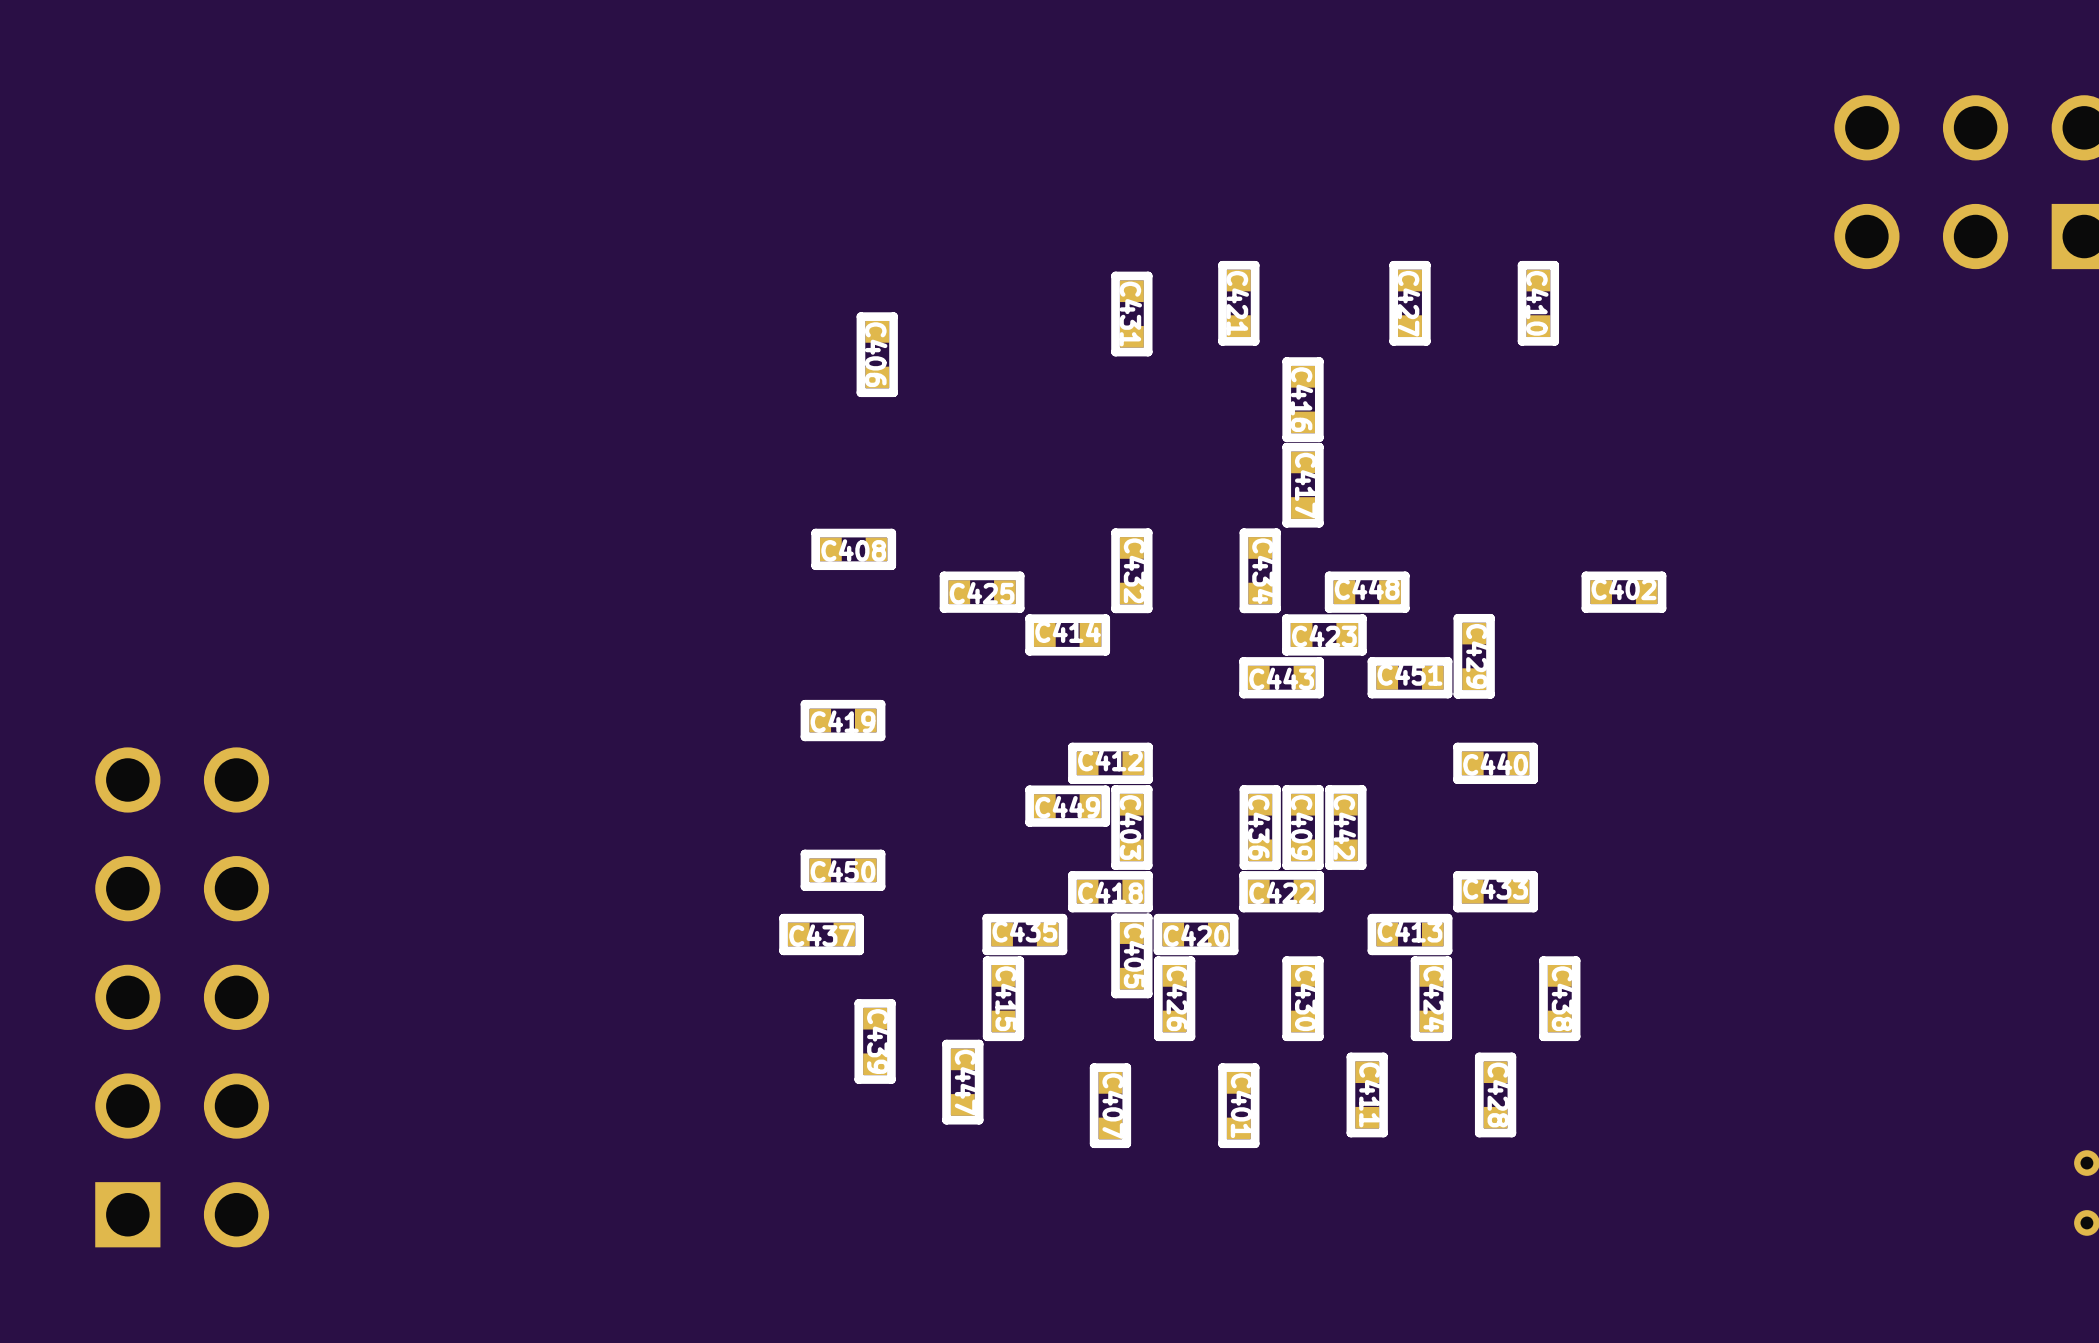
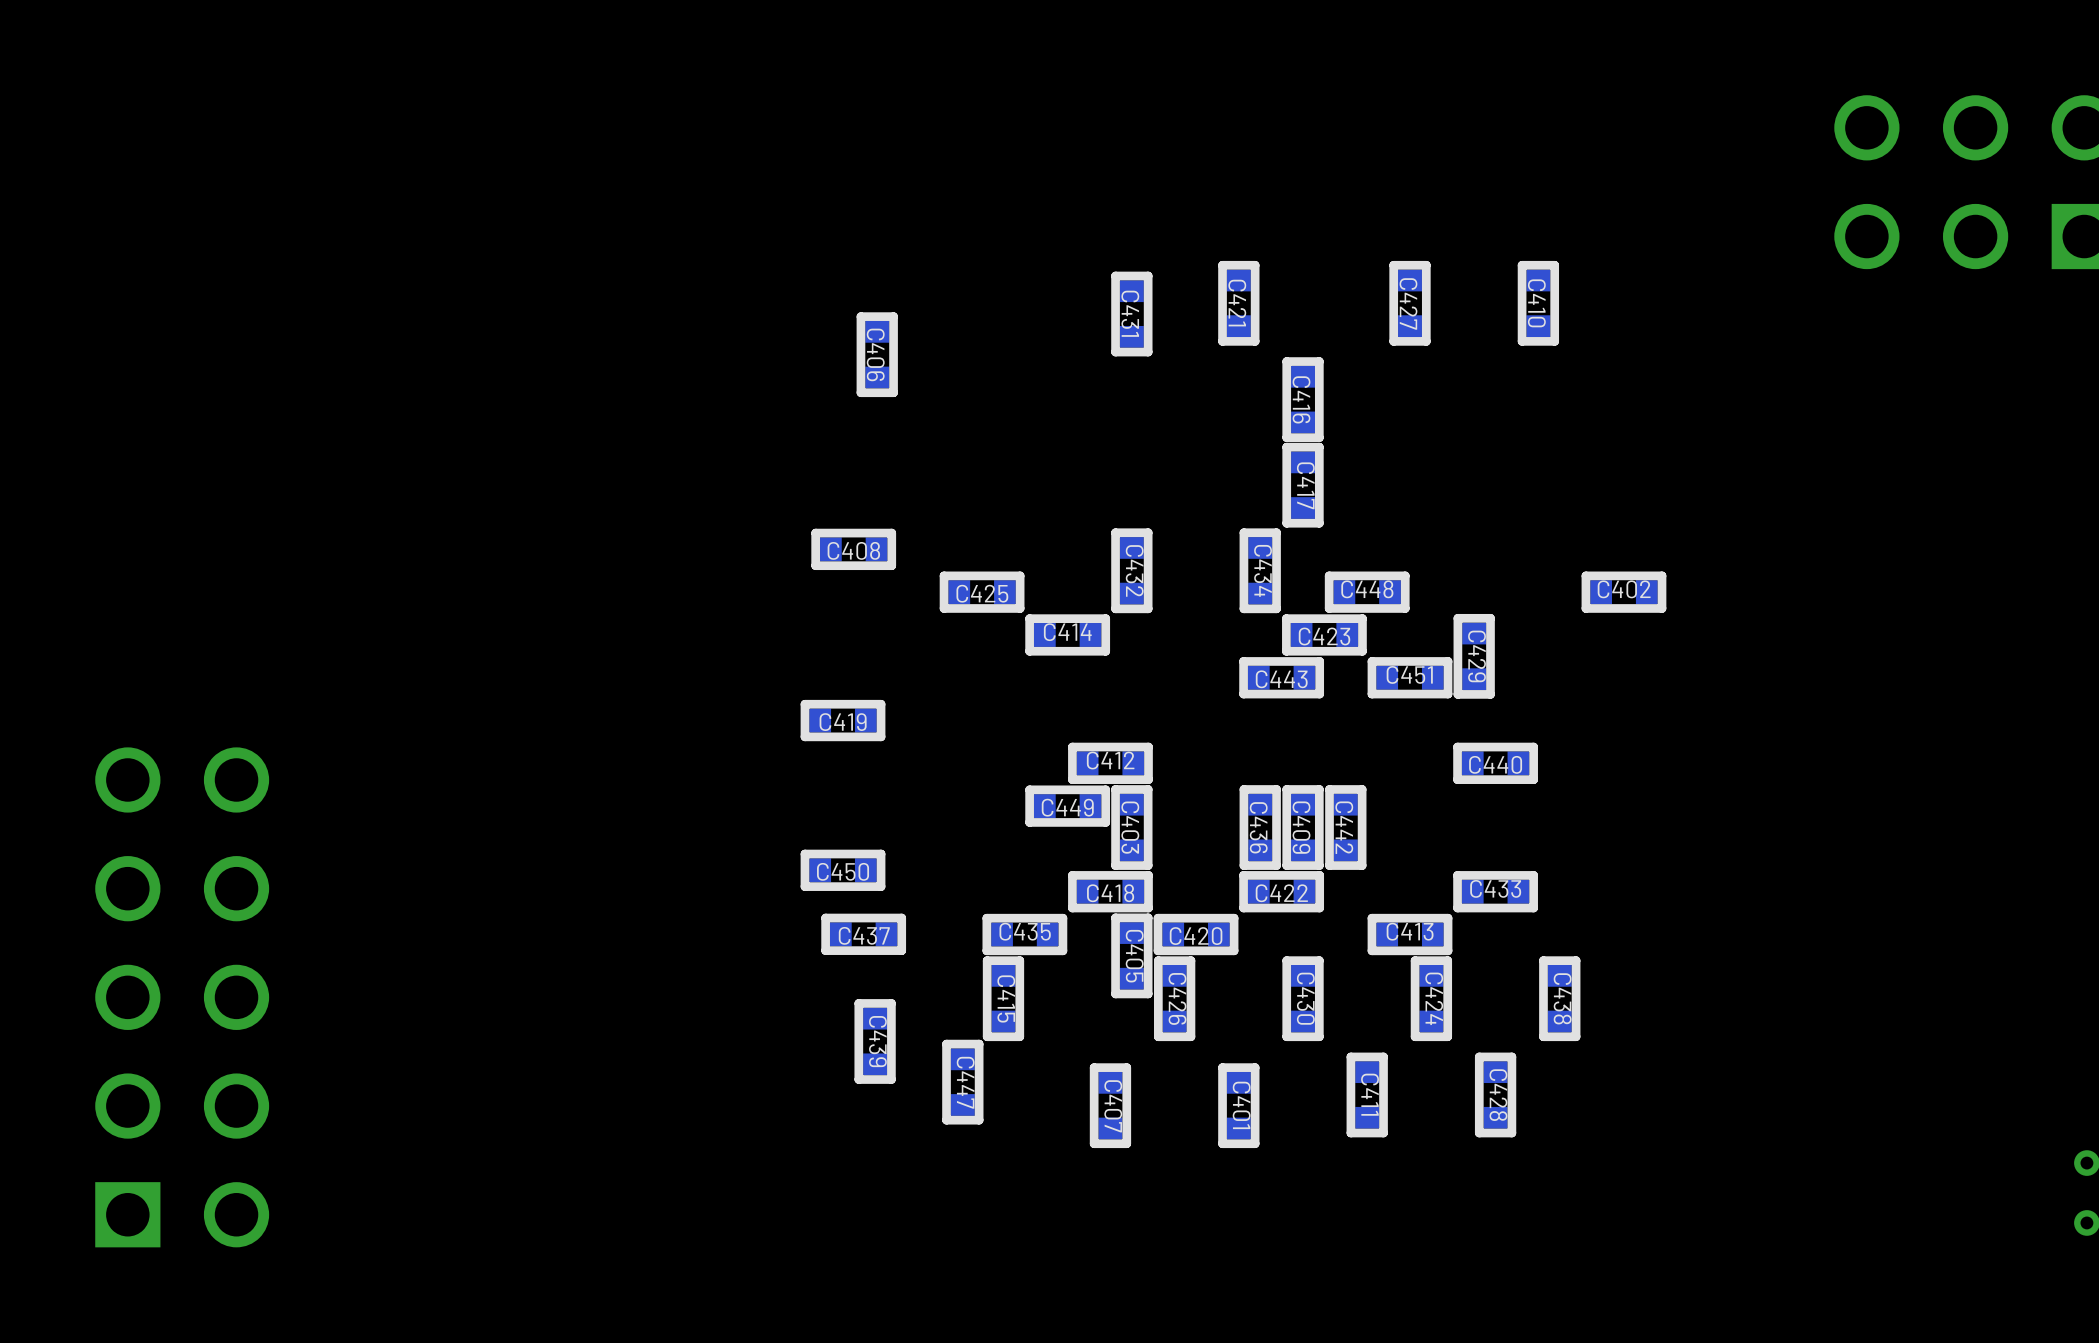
C437 position: (821, 934) -> (863, 934)

